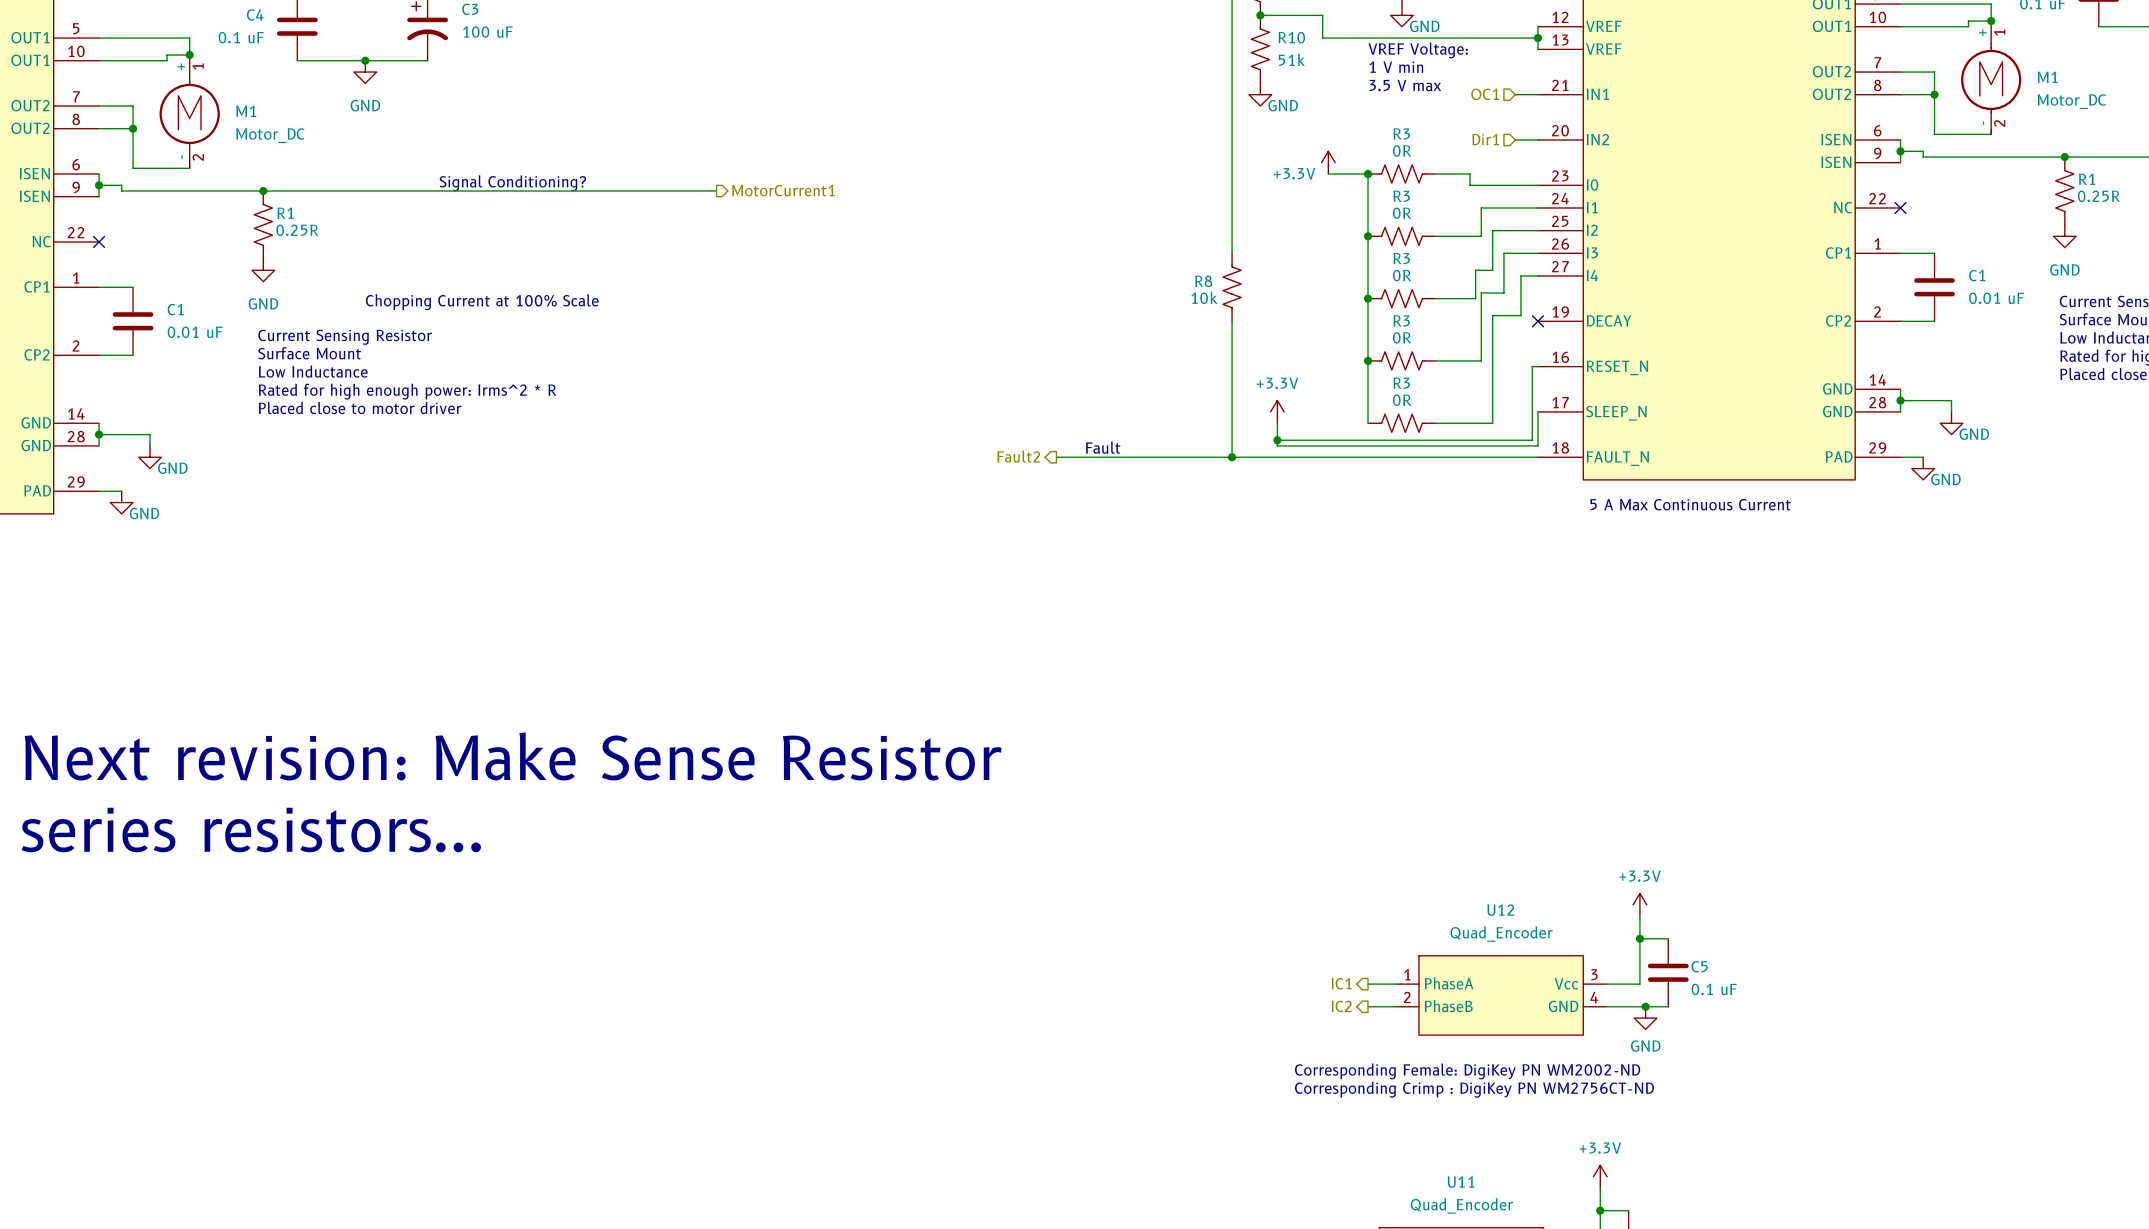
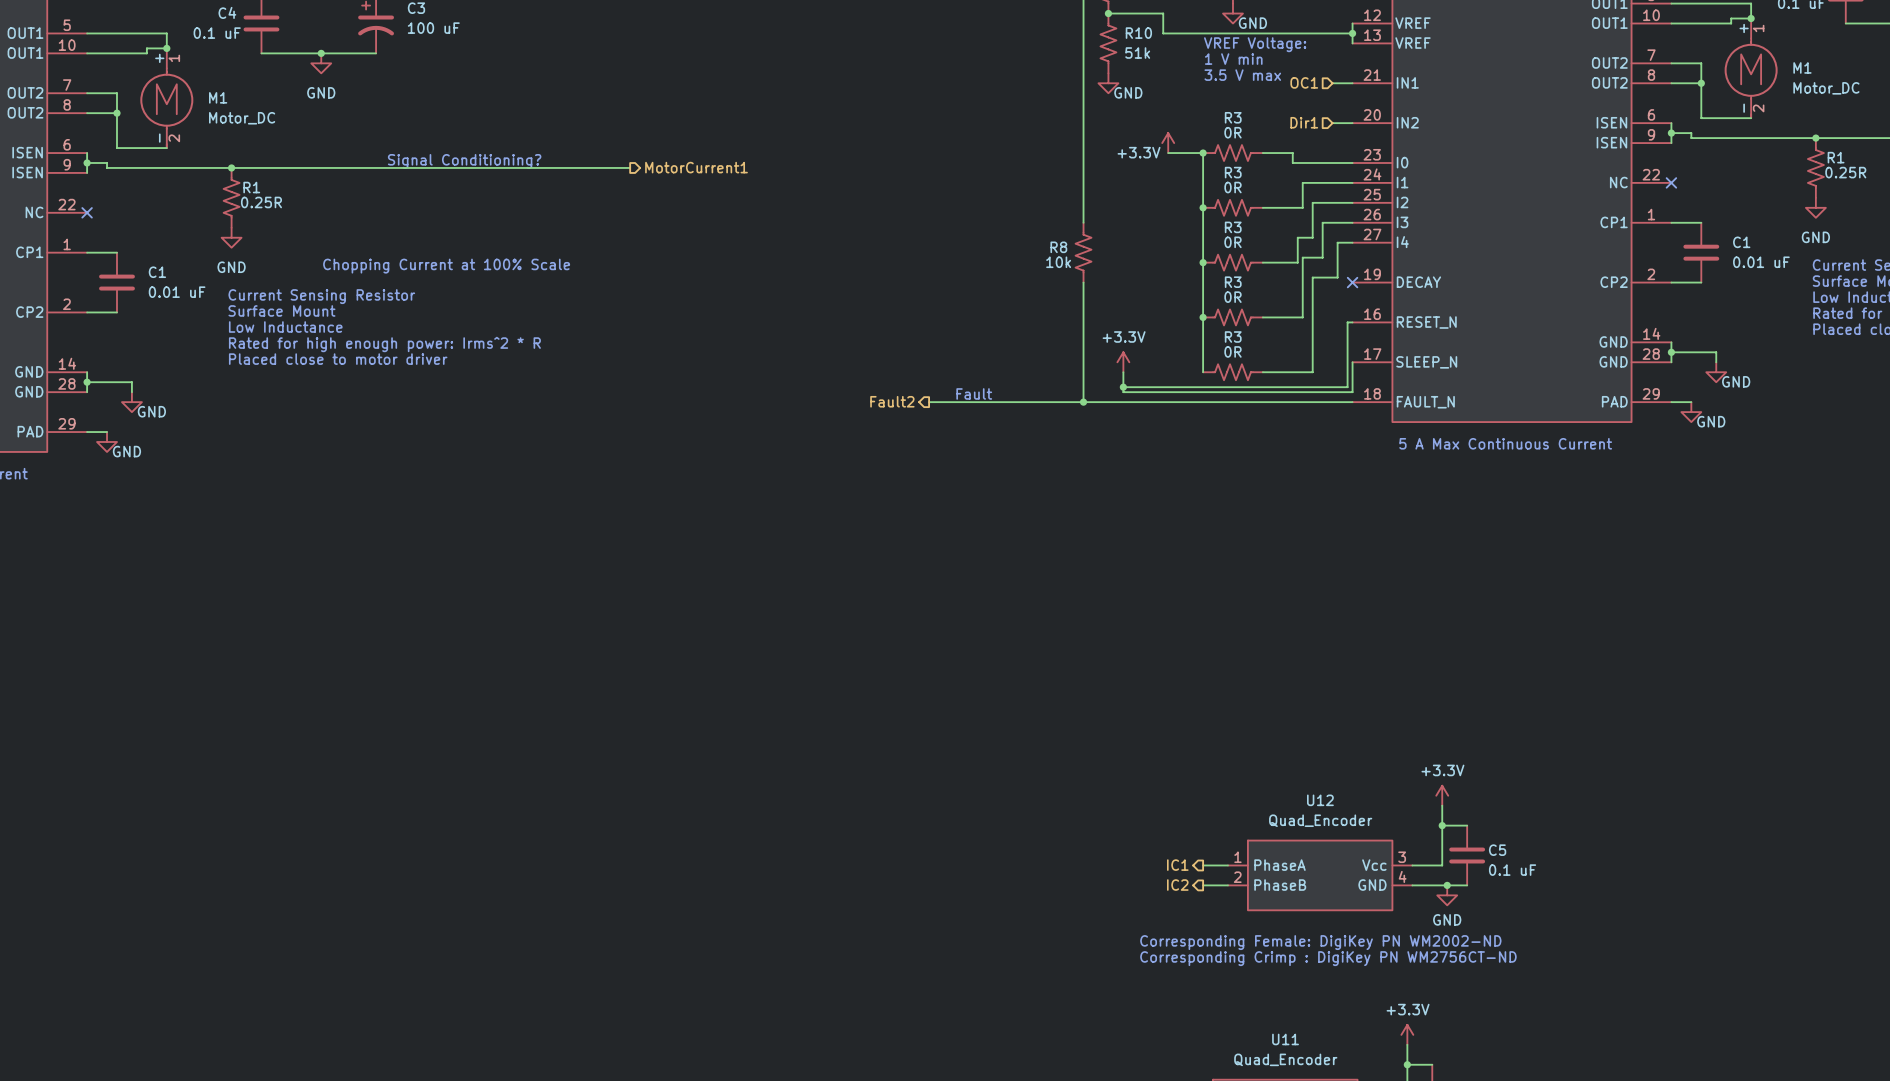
text: Next revision: Make Sense Resistor (513, 756) -> none
text: series resistors... (251, 830) -> none

